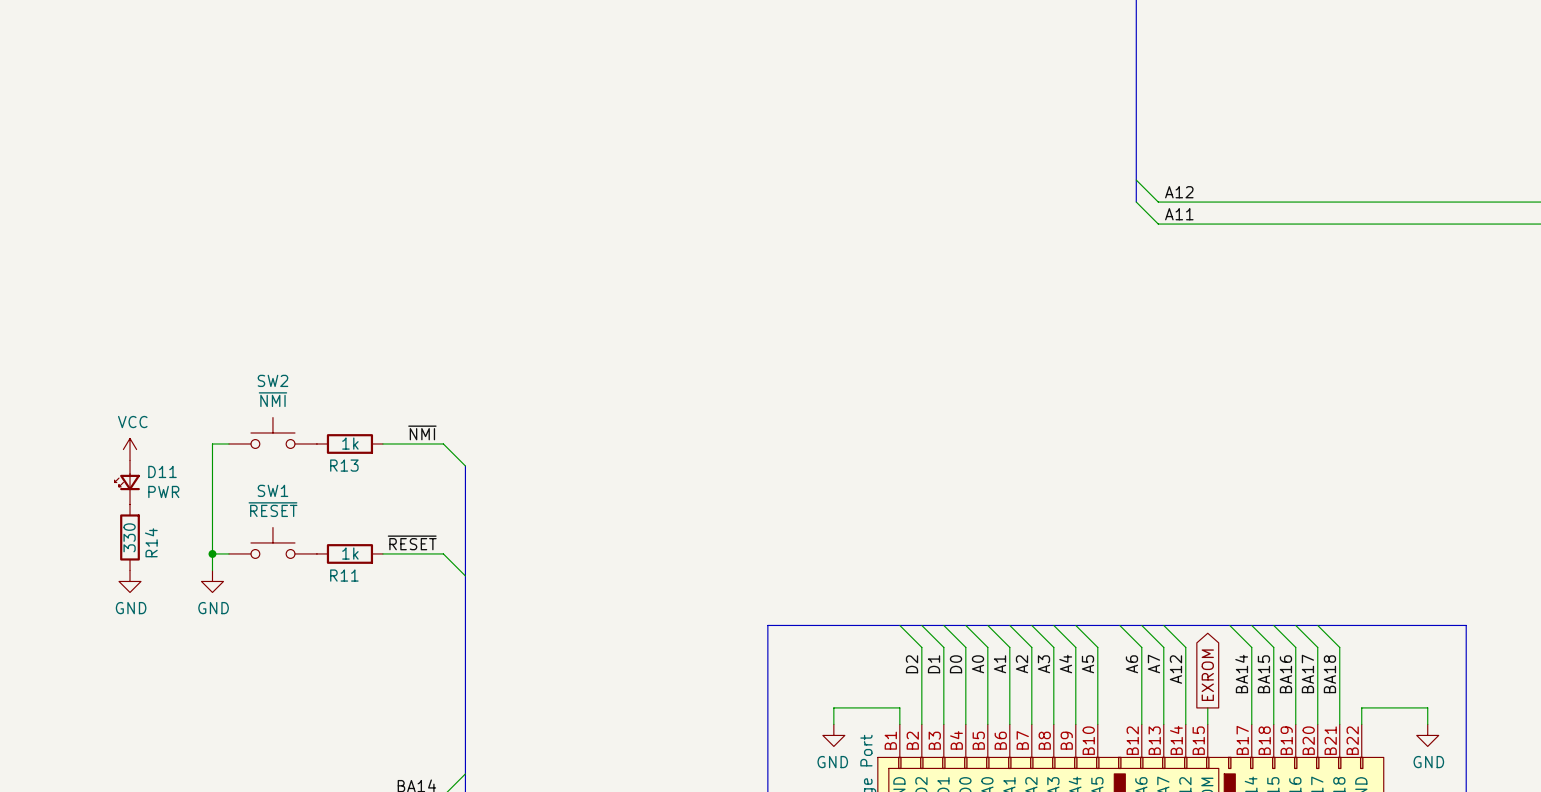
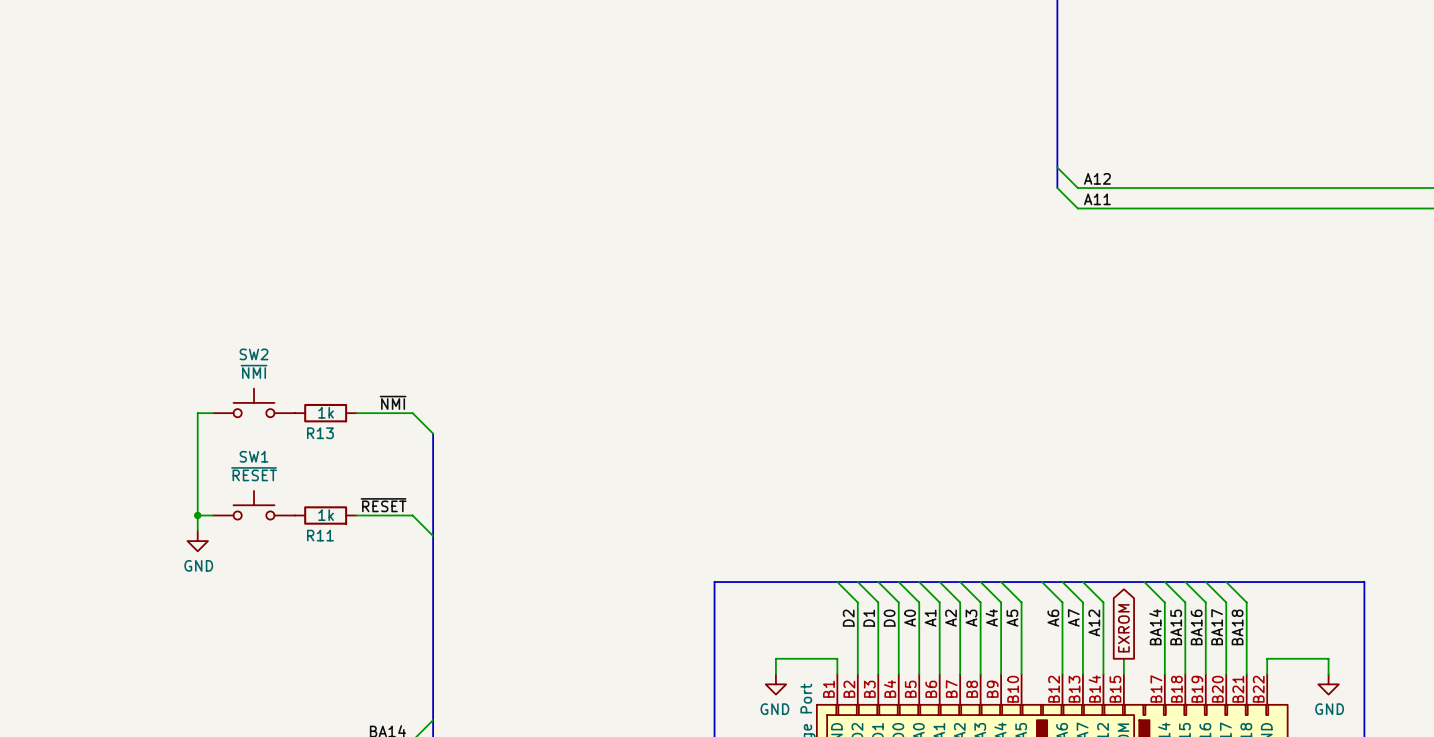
power symbol: VCC (130, 449) -> none
D11: PWR (127, 482) -> none
R14: 330 (130, 537) -> none
power symbol: GND (130, 581) -> none

